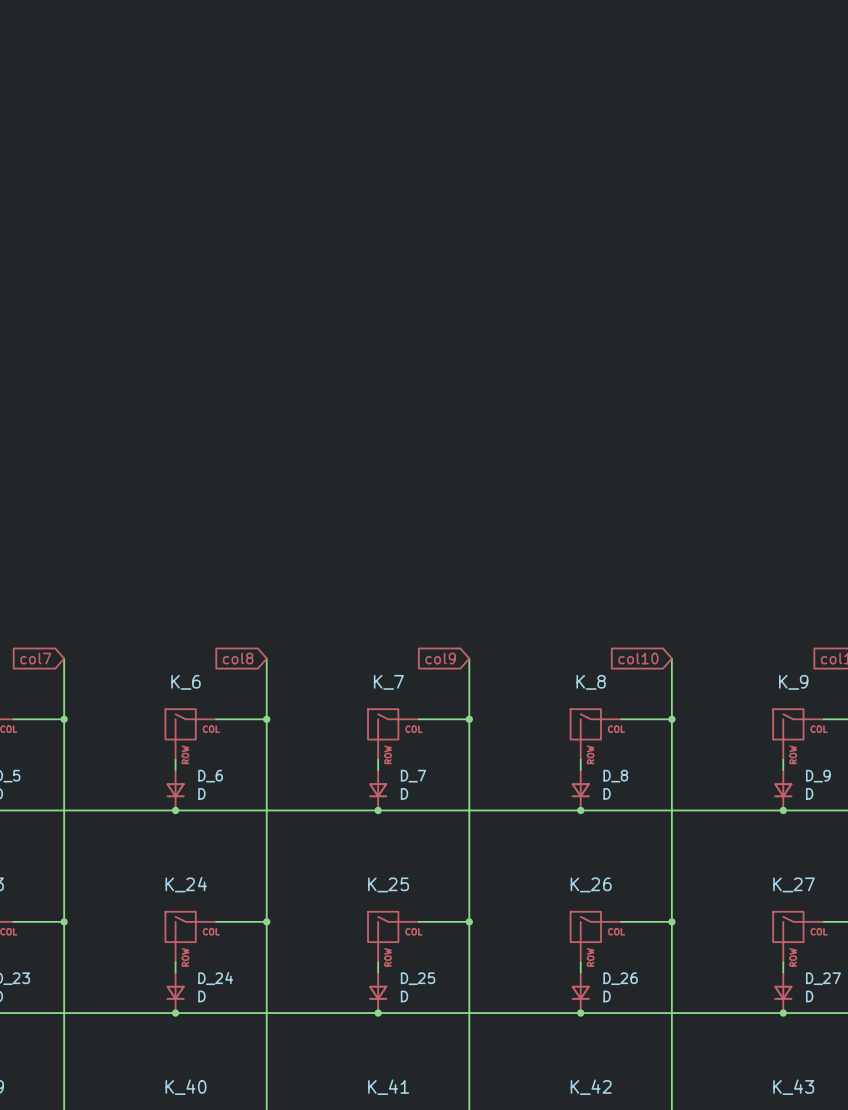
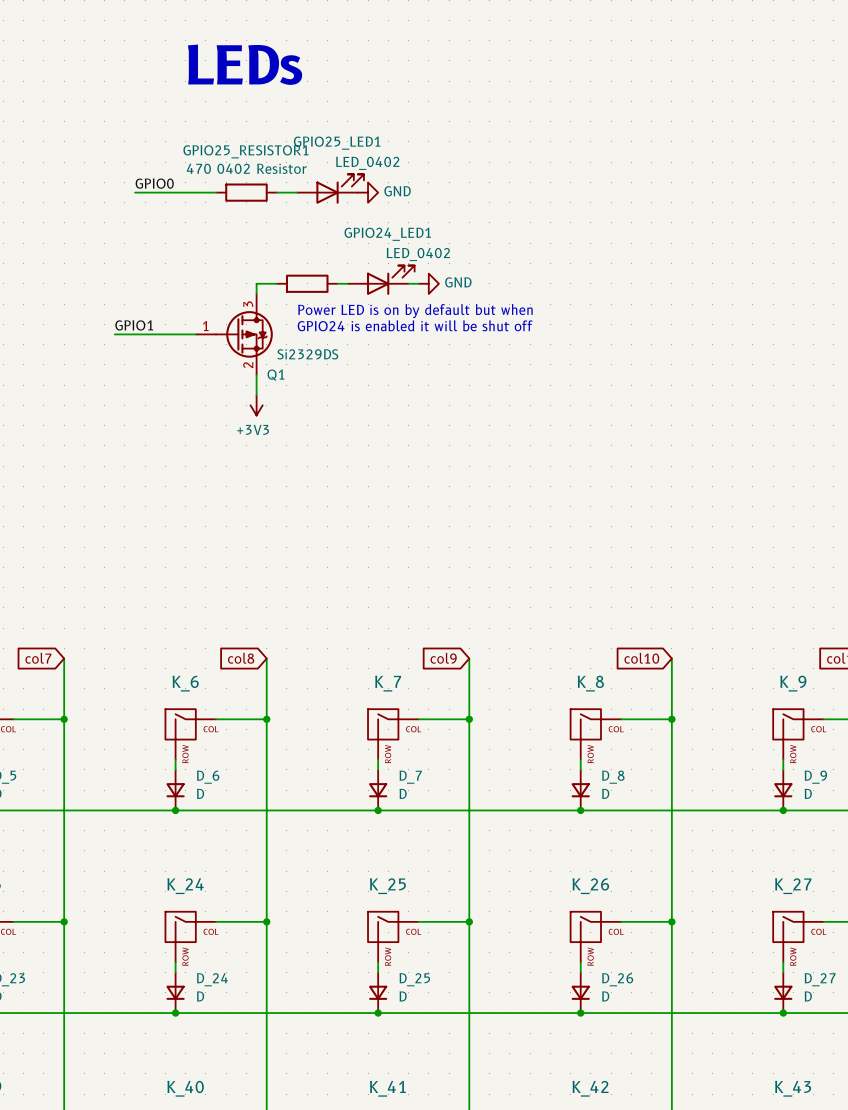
text: none -> LEDs (245, 64)
label: none -> GPIO0 (154, 183)
GPIO25_LED1: none -> LED_0402 (330, 189)
wire: none -> (135, 192) (216, 192)
GPIO25_RESISTOR1: none -> 470 0402 Resistor (246, 192)
wire: none -> (276, 192) (297, 192)
power symbol: none -> GND (368, 192)
GPIO24_LED1: none -> LED_0402 (381, 280)
wire: none -> (276, 283) (256, 283) (256, 293)
part: none -> (307, 283)
wire: none -> (337, 283) (347, 283)
wire: none -> (408, 283) (418, 283)
power symbol: none -> GND (428, 283)
text: none -> Power LED is on by default but when (415, 311)
label: none -> GPIO1 (134, 325)
text: none -> GPIO24 is enabled it will be shut off (415, 325)
wire: none -> (114, 334) (195, 334)
Q1: none -> Si2329DS (234, 334)
wire: none -> (256, 374) (256, 395)
power symbol: none -> +3V3 (256, 405)

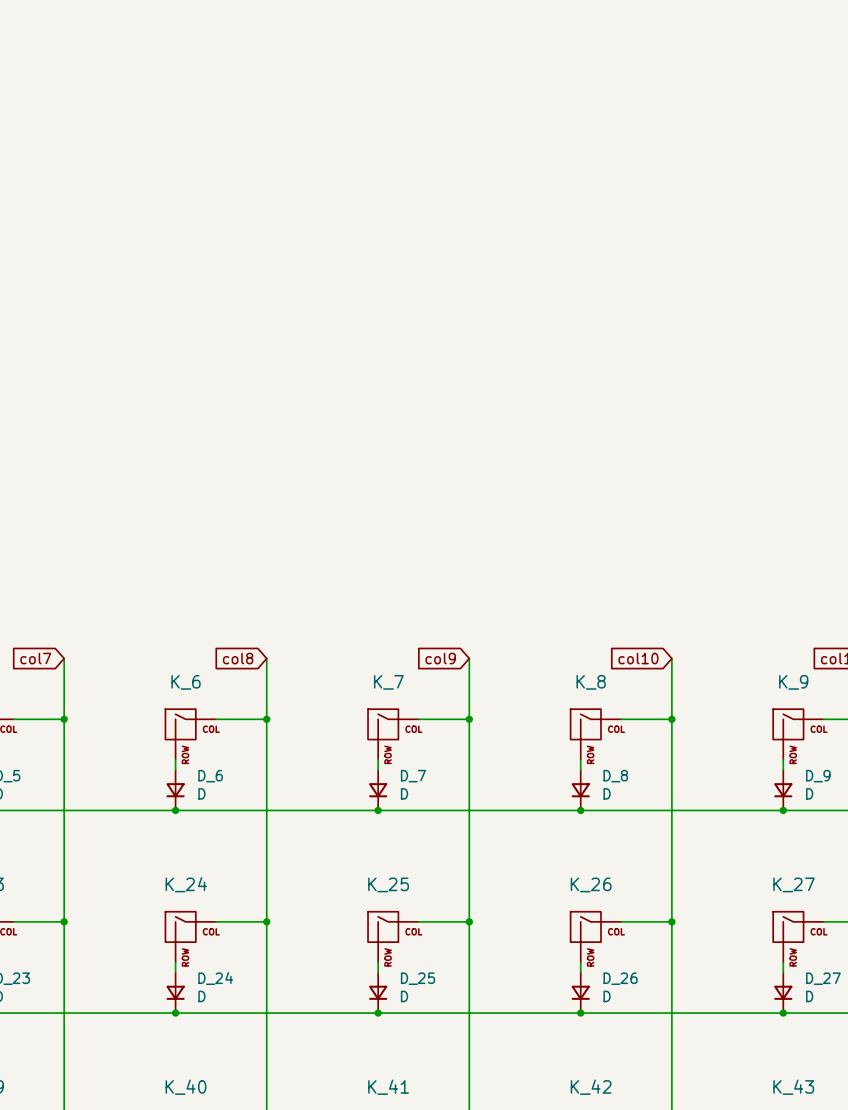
text: LEDs (245, 64) -> none
label: GPIO0 (154, 183) -> none
GPIO25_LED1: LED_0402 (330, 189) -> none
wire: (135, 192) (216, 192) -> none
GPIO25_RESISTOR1: 470 0402 Resistor (246, 192) -> none
wire: (276, 192) (297, 192) -> none
power symbol: GND (368, 192) -> none
GPIO24_LED1: LED_0402 (381, 280) -> none
wire: (276, 283) (256, 283) (256, 293) -> none
part: (307, 283) -> none
wire: (337, 283) (347, 283) -> none
wire: (408, 283) (418, 283) -> none
power symbol: GND (428, 283) -> none
text: Power LED is on by default but when (415, 311) -> none
label: GPIO1 (134, 325) -> none
text: GPIO24 is enabled it will be shut off (415, 325) -> none
wire: (114, 334) (195, 334) -> none
Q1: Si2329DS (234, 334) -> none
wire: (256, 374) (256, 395) -> none
power symbol: +3V3 (256, 405) -> none

